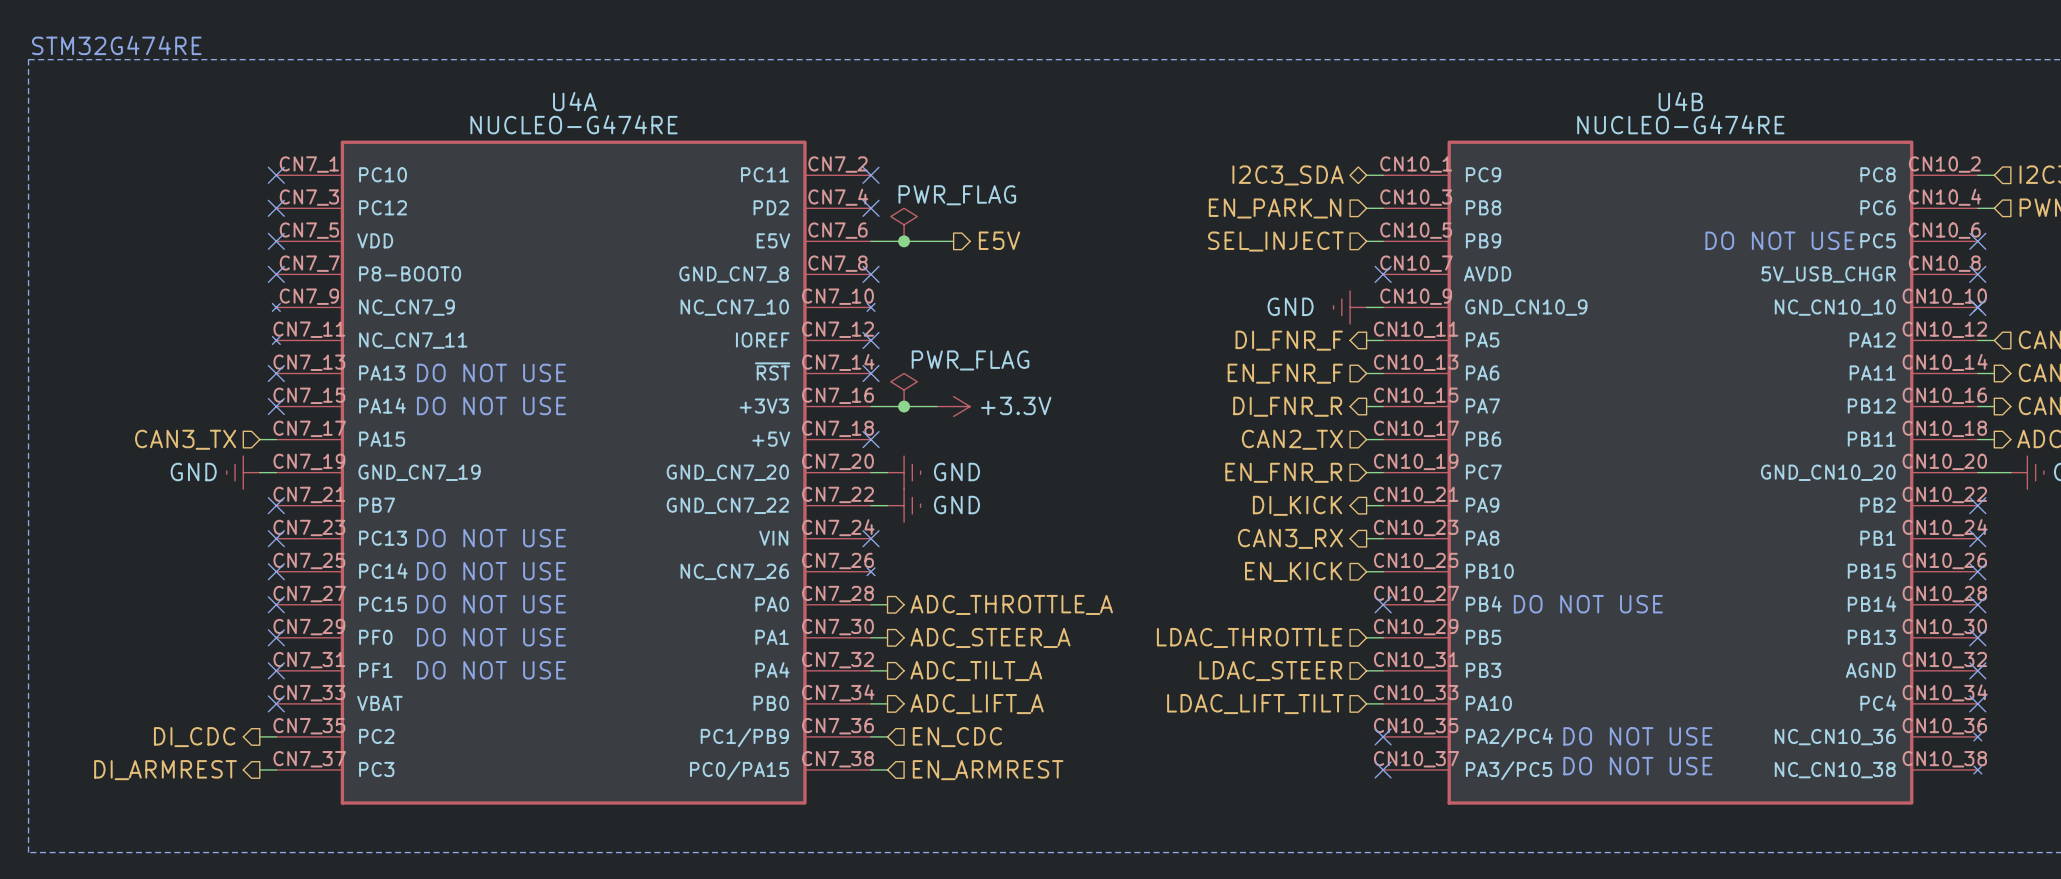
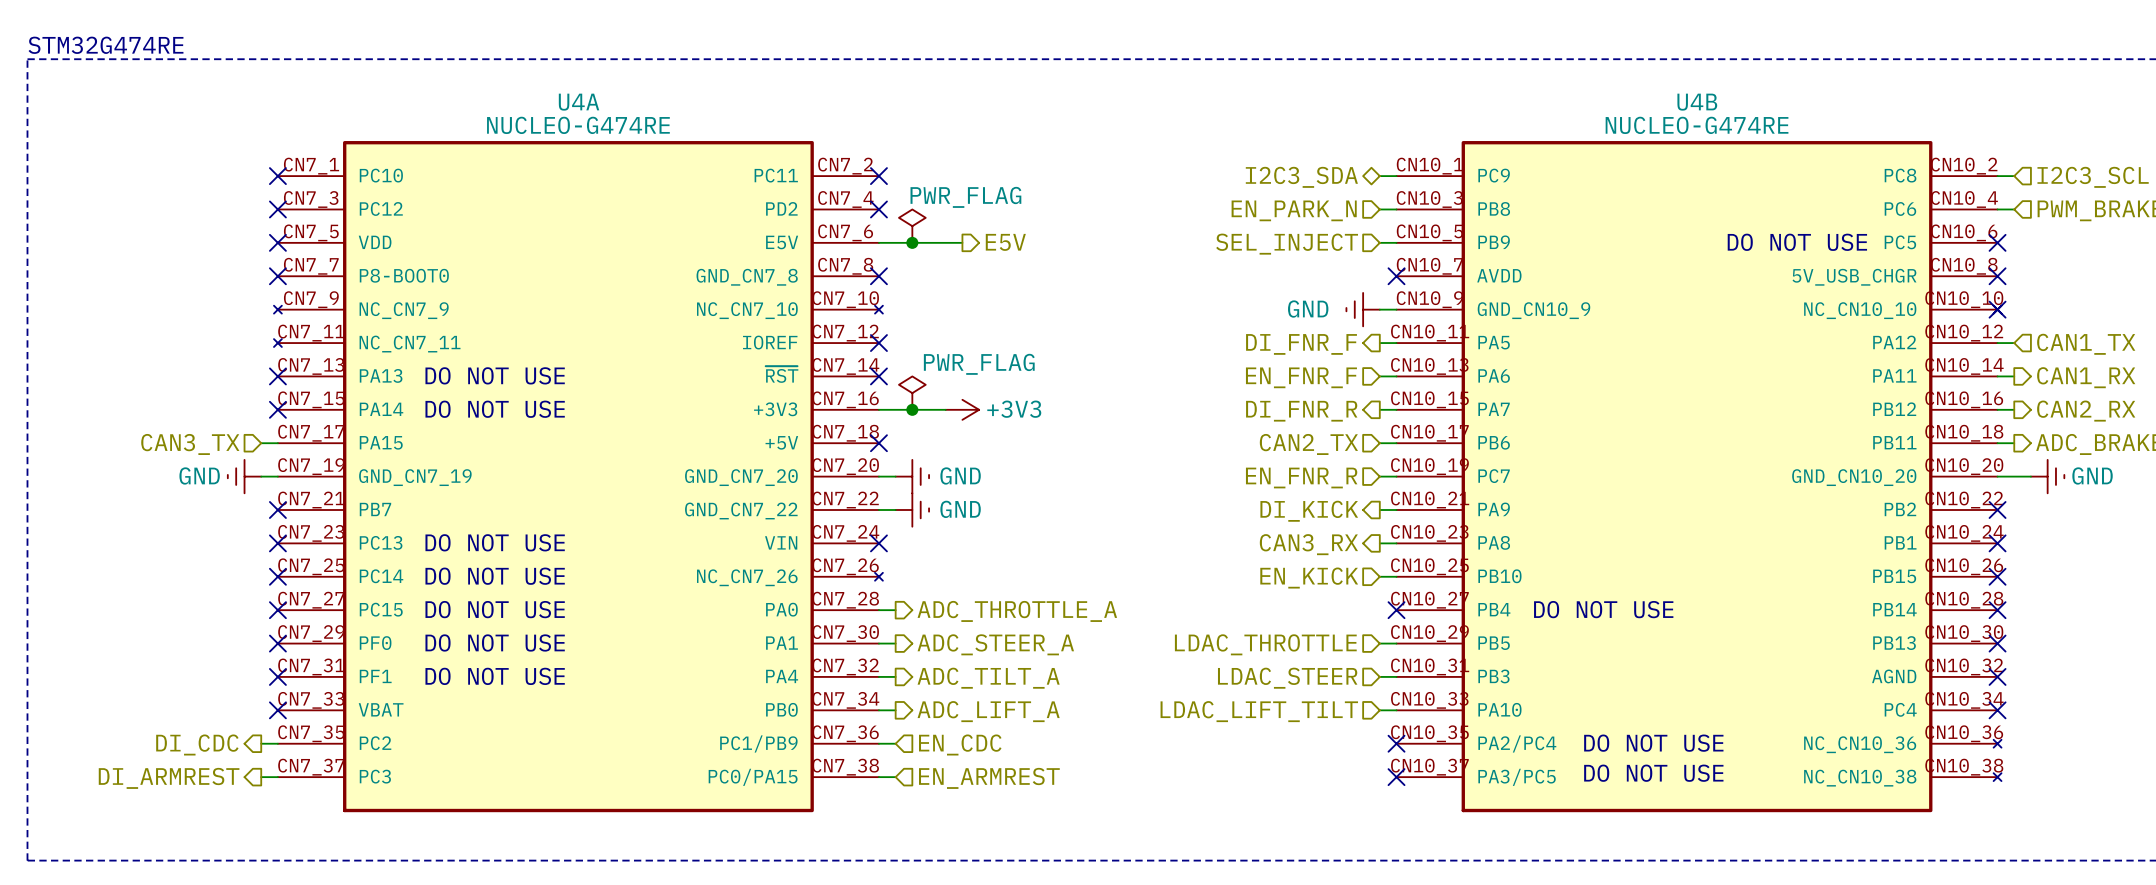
power symbol: +3.3V (953, 406) -> +3V3 (962, 409)

